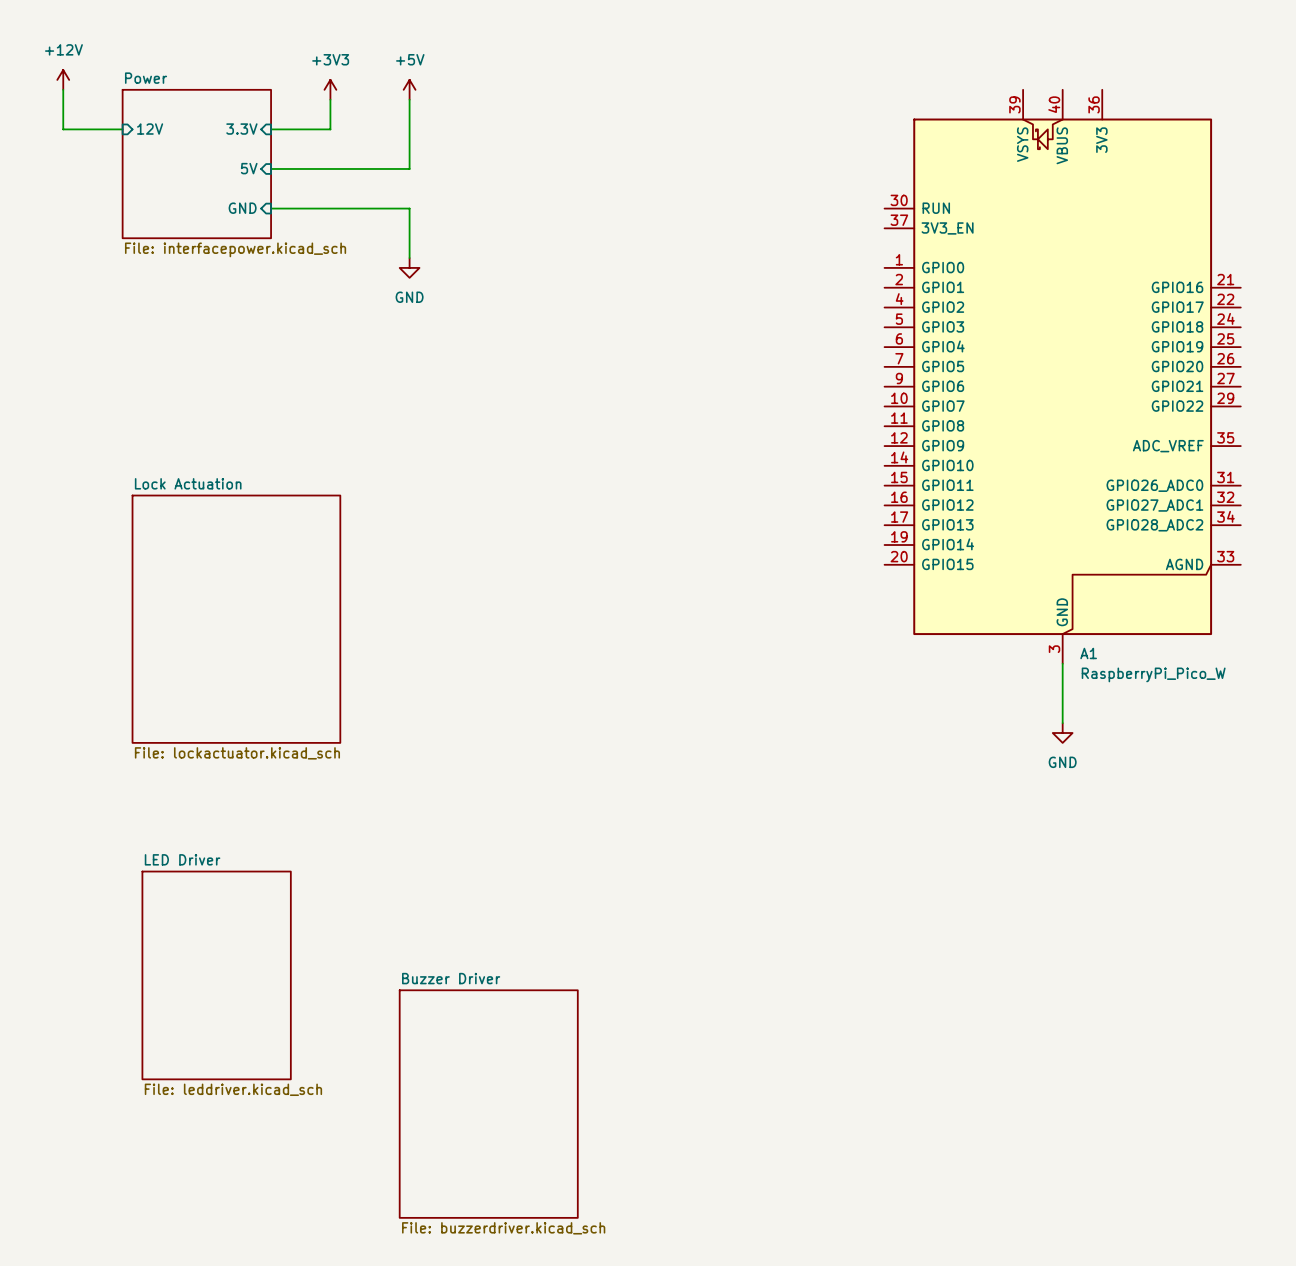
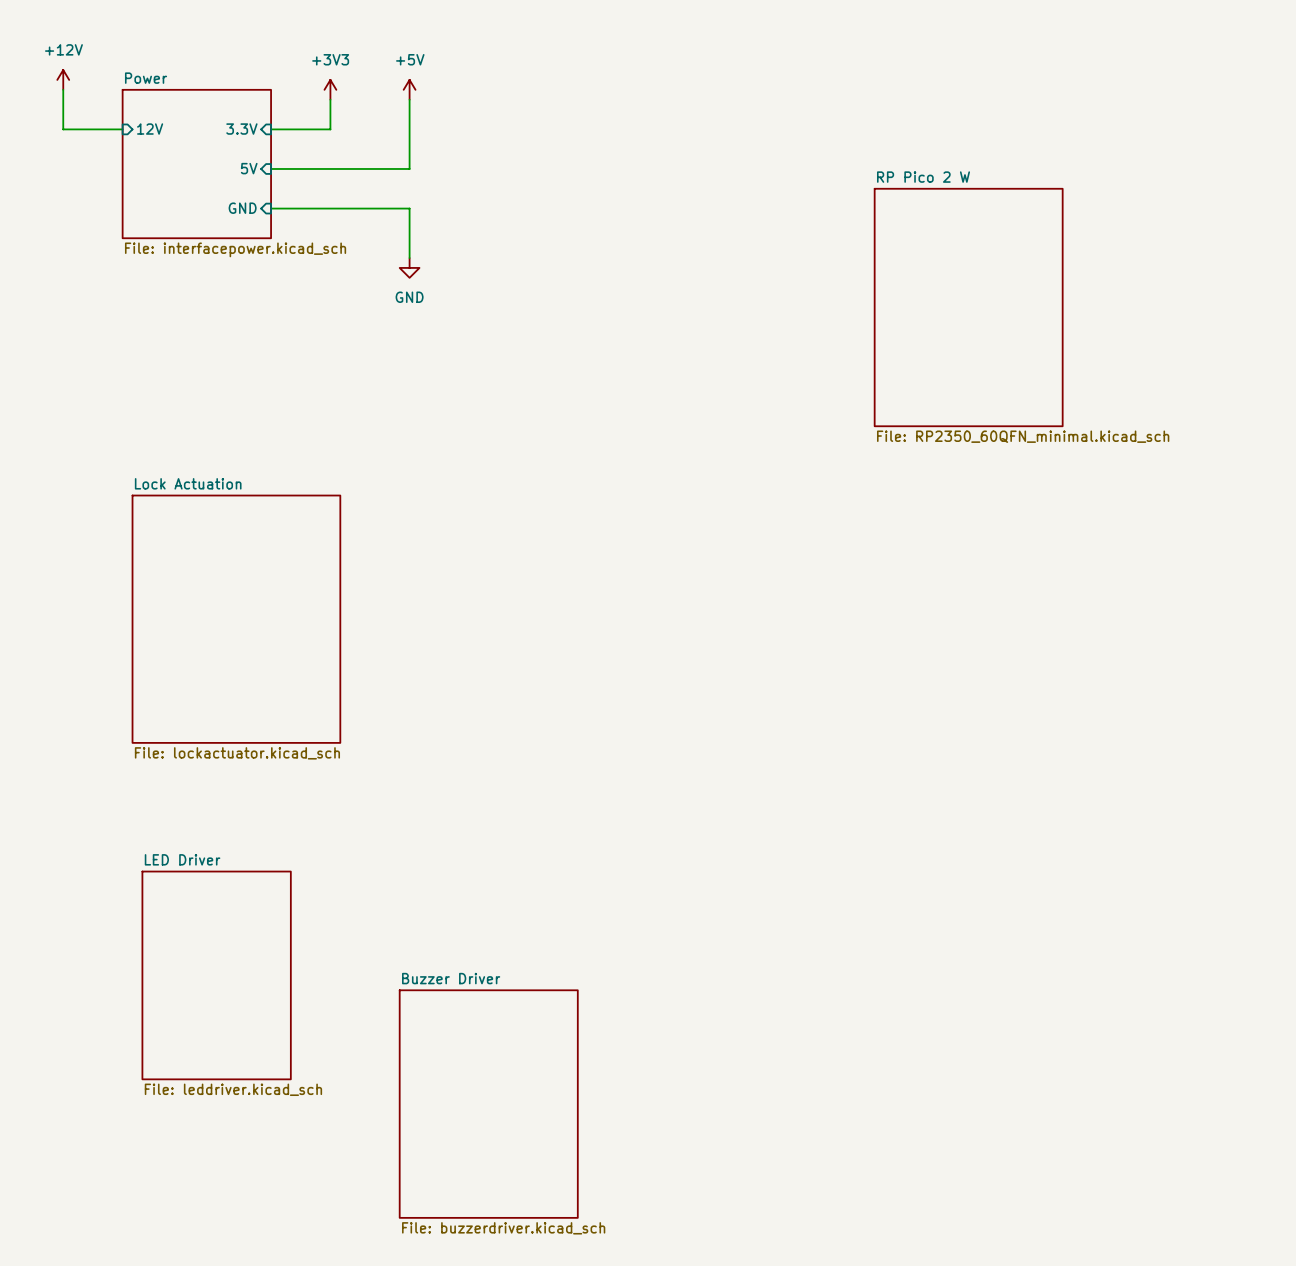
sheet RP Pico 2 W: none -> File: RP2350_60QFN_minimal.kicad_sch (968, 307)
A1: RaspberryPi_Pico_W (1062, 376) -> none
wire: (1062, 663) (1062, 723) -> none
power symbol: GND (1062, 733) -> none

